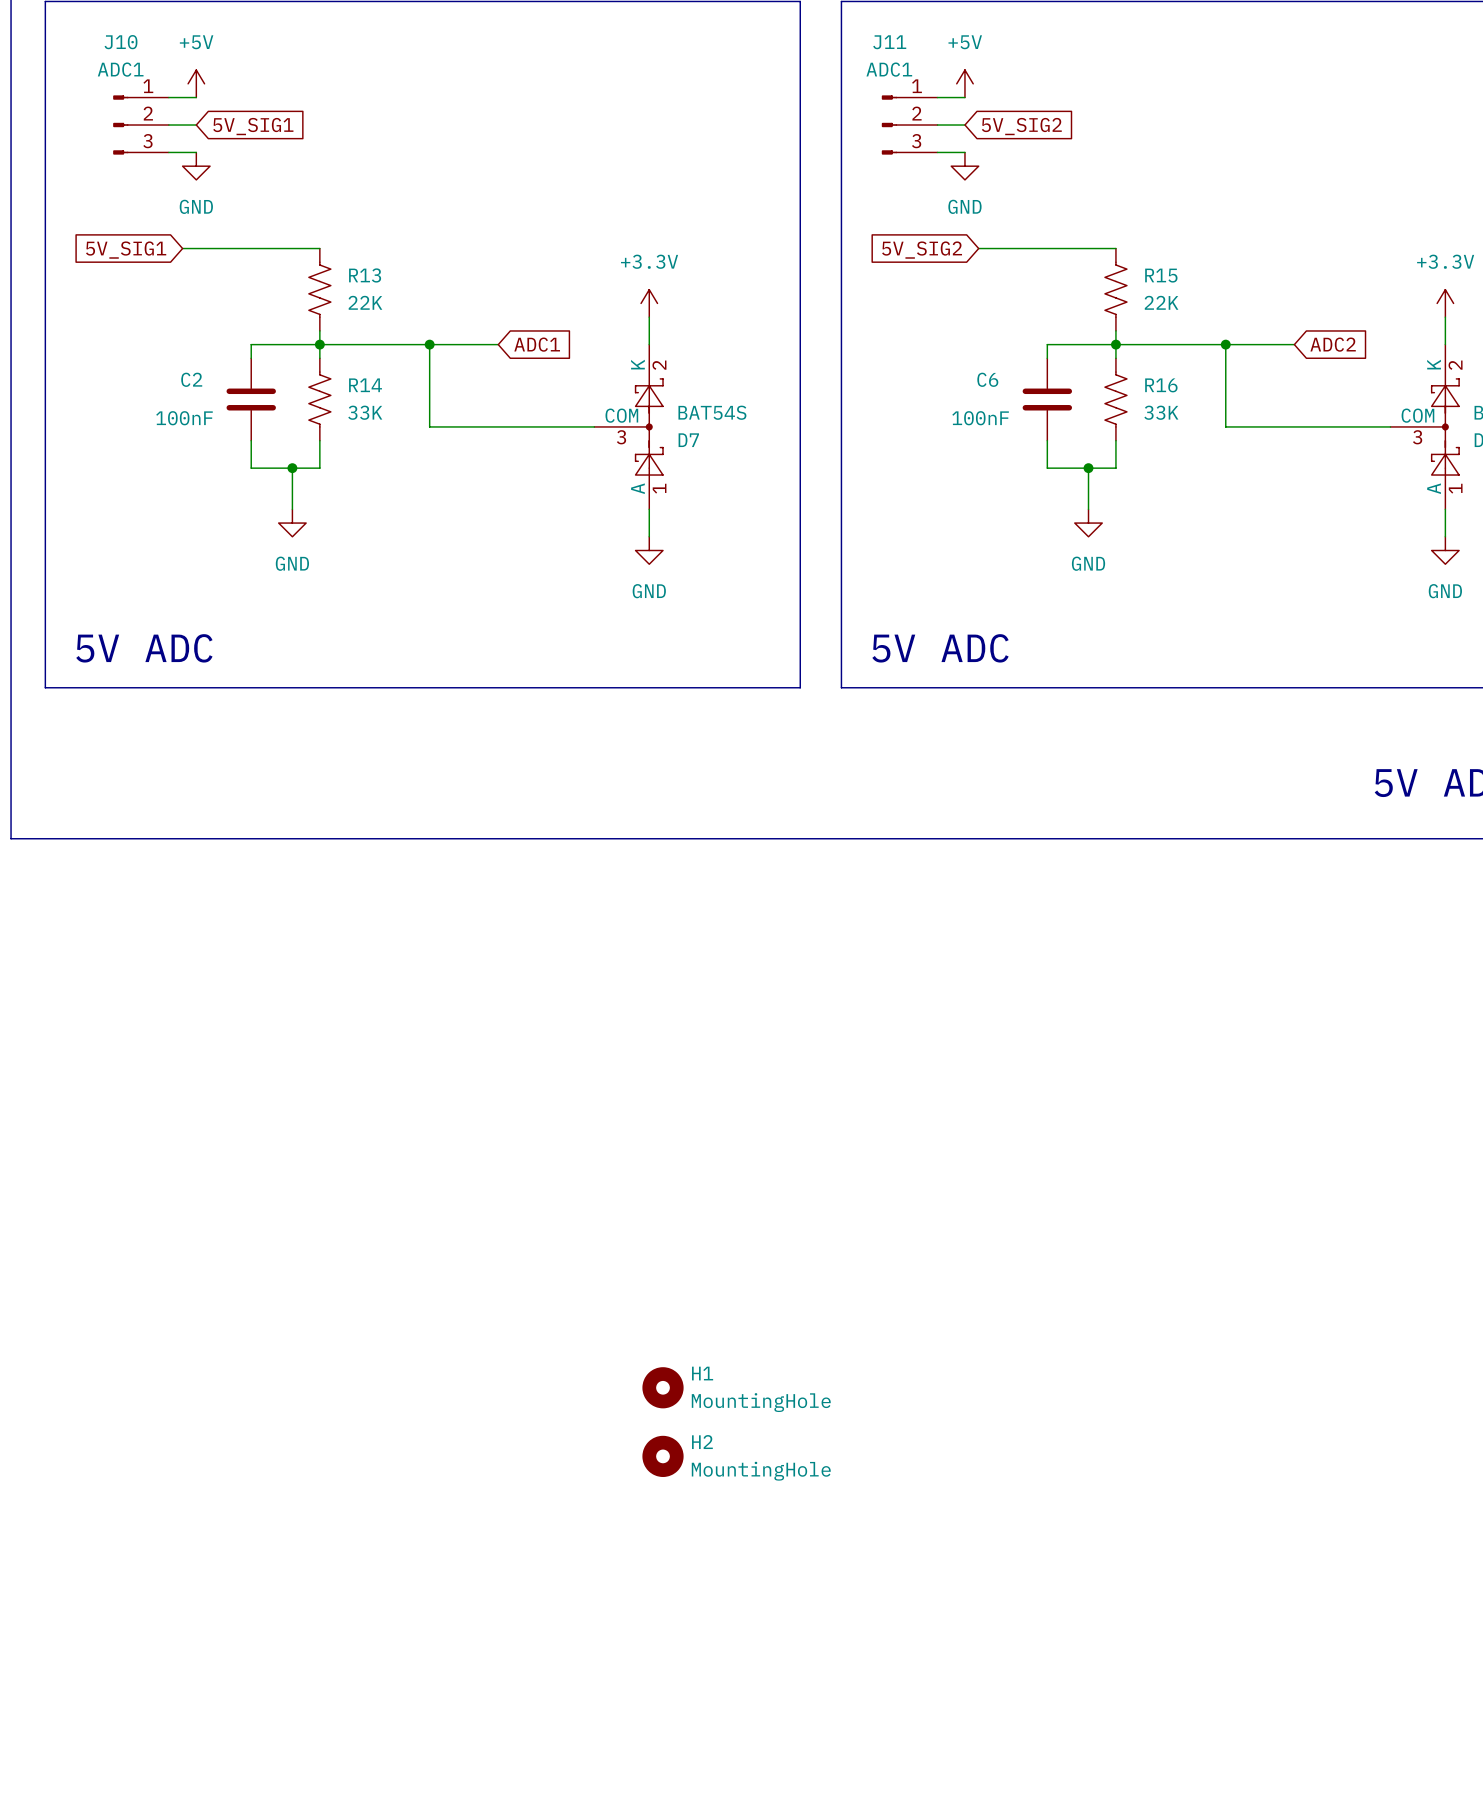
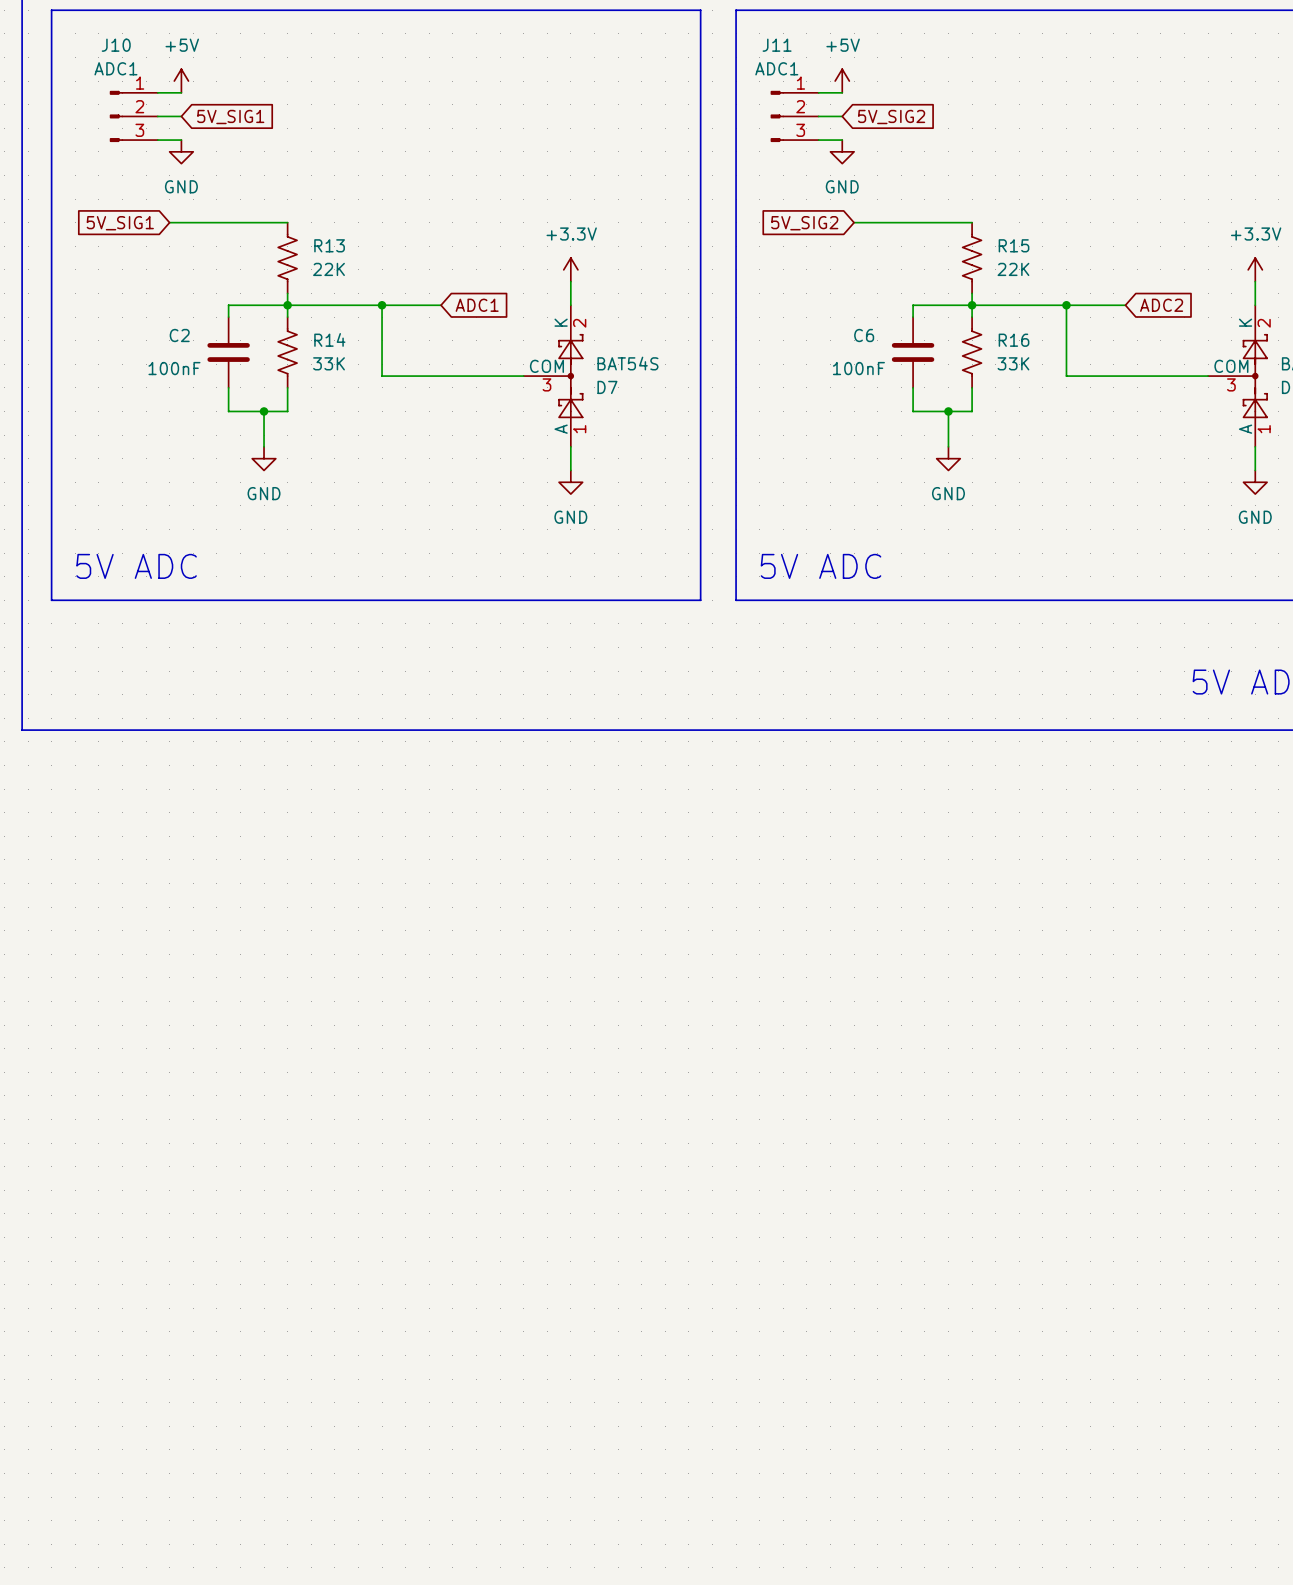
H1: MountingHole (663, 1387) -> none
H2: MountingHole (663, 1456) -> none

